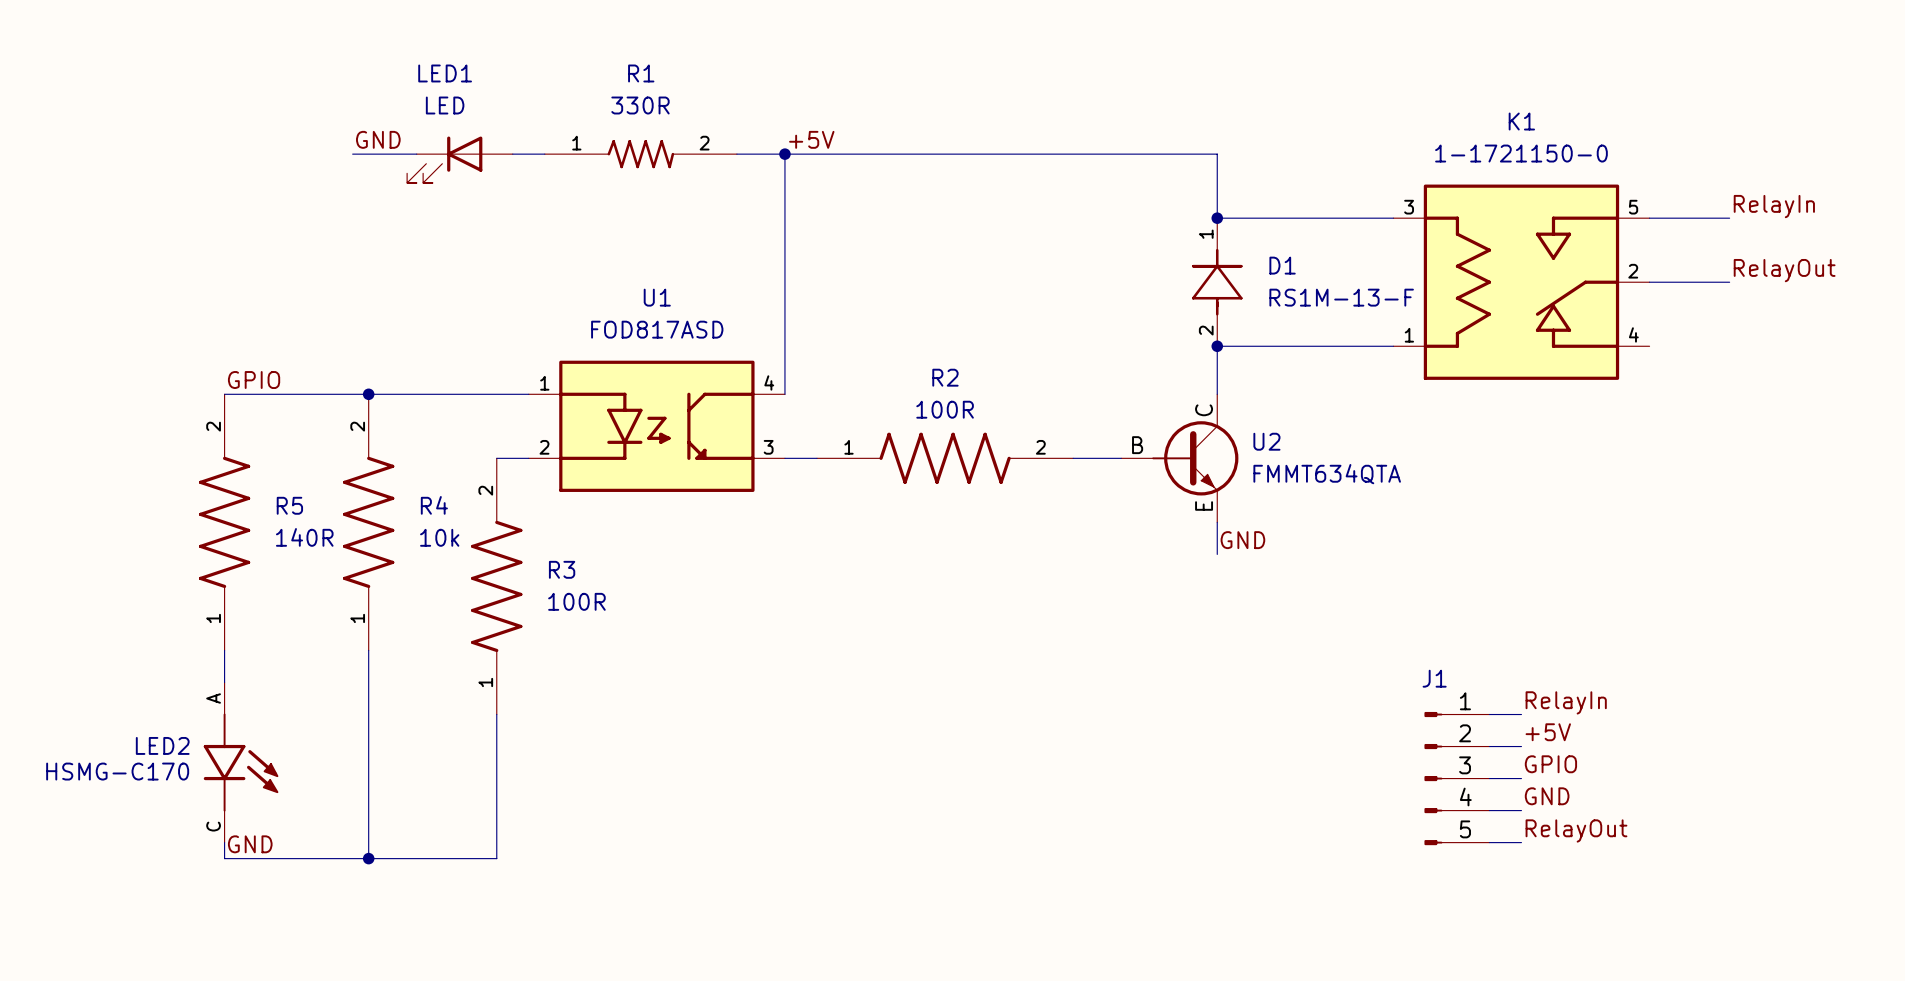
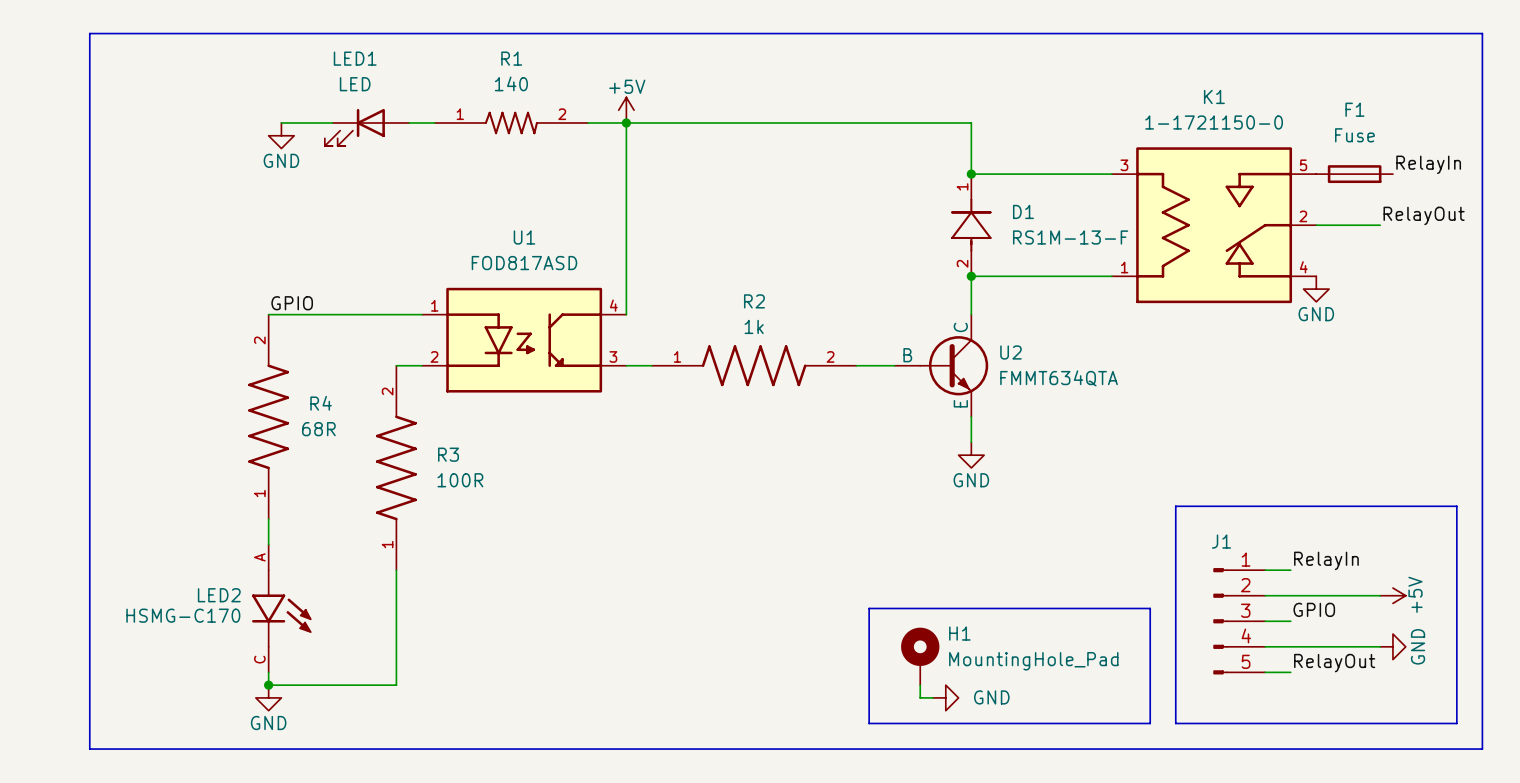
line: none -> (89, 33) (1482, 33) (1482, 749) (89, 749) (89, 33)
R1 value: 330R (640, 105) -> 140 (511, 83)
power symbol: none -> +5V (626, 110)
label: GND (378, 139) -> none
label: +5V (811, 139) -> none
power symbol: none -> GND (281, 135)
label position: RelayIn (1774, 206) -> RelayIn (1428, 164)
F1: none -> Fuse (1354, 174)
power symbol: none -> GND (1316, 289)
label position: GPIO (254, 380) -> GPIO (292, 303)
wire: (224, 394) (336, 394) -> none
junction: (368, 394) -> none
R2 value: 100R (945, 409) -> 1k (754, 326)
R5: 140R (224, 522) -> none
R4 position: (368, 522) -> (268, 416)
R4 value: 10k (439, 537) -> 68R (318, 429)
label: GND (1242, 540) -> none
power symbol: none -> GND (971, 455)
line: none -> (1175, 506) (1456, 506) (1456, 723) (1175, 723) (1175, 506)
wire: (224, 650) (224, 682) -> (268, 519) (268, 544)
wire: (368, 650) (368, 858) -> none
label position: RelayIn (1566, 702) -> RelayIn (1326, 560)
wire: (1489, 714) (1521, 714) -> (1265, 570) (1290, 570)
label: +5V (1548, 732) -> none
wire: (1489, 746) (1521, 746) -> none
wire: none -> (1265, 595) (1380, 595)
power symbol: none -> +5V (1392, 595)
LED2 position: (241, 762) -> (281, 608)
line: none -> (869, 608) (1150, 608) (1150, 723) (869, 723) (869, 608)
label position: GPIO (1550, 764) -> GPIO (1314, 609)
J1 position: (1456, 778) -> (1239, 621)
wire: (1489, 778) (1521, 778) -> (1265, 621) (1290, 621)
label: GND (1547, 796) -> none
wire: (1489, 810) (1521, 810) -> none
wire: none -> (1265, 646) (1380, 646)
power symbol: none -> GND (1392, 646)
H1: none -> MountingHole_Pad (920, 656)
label position: RelayOut (1576, 830) -> RelayOut (1334, 663)
wire: (224, 842) (224, 858) (336, 858) -> (268, 672) (268, 685)
wire: (1489, 842) (1521, 842) -> (1265, 672) (1290, 672)
label: GND (250, 844) -> none
junction position: (368, 858) -> (268, 685)
wire: none -> (920, 685) (920, 697) (933, 697)
power symbol: none -> GND (268, 697)
power symbol: none -> GND (945, 697)

